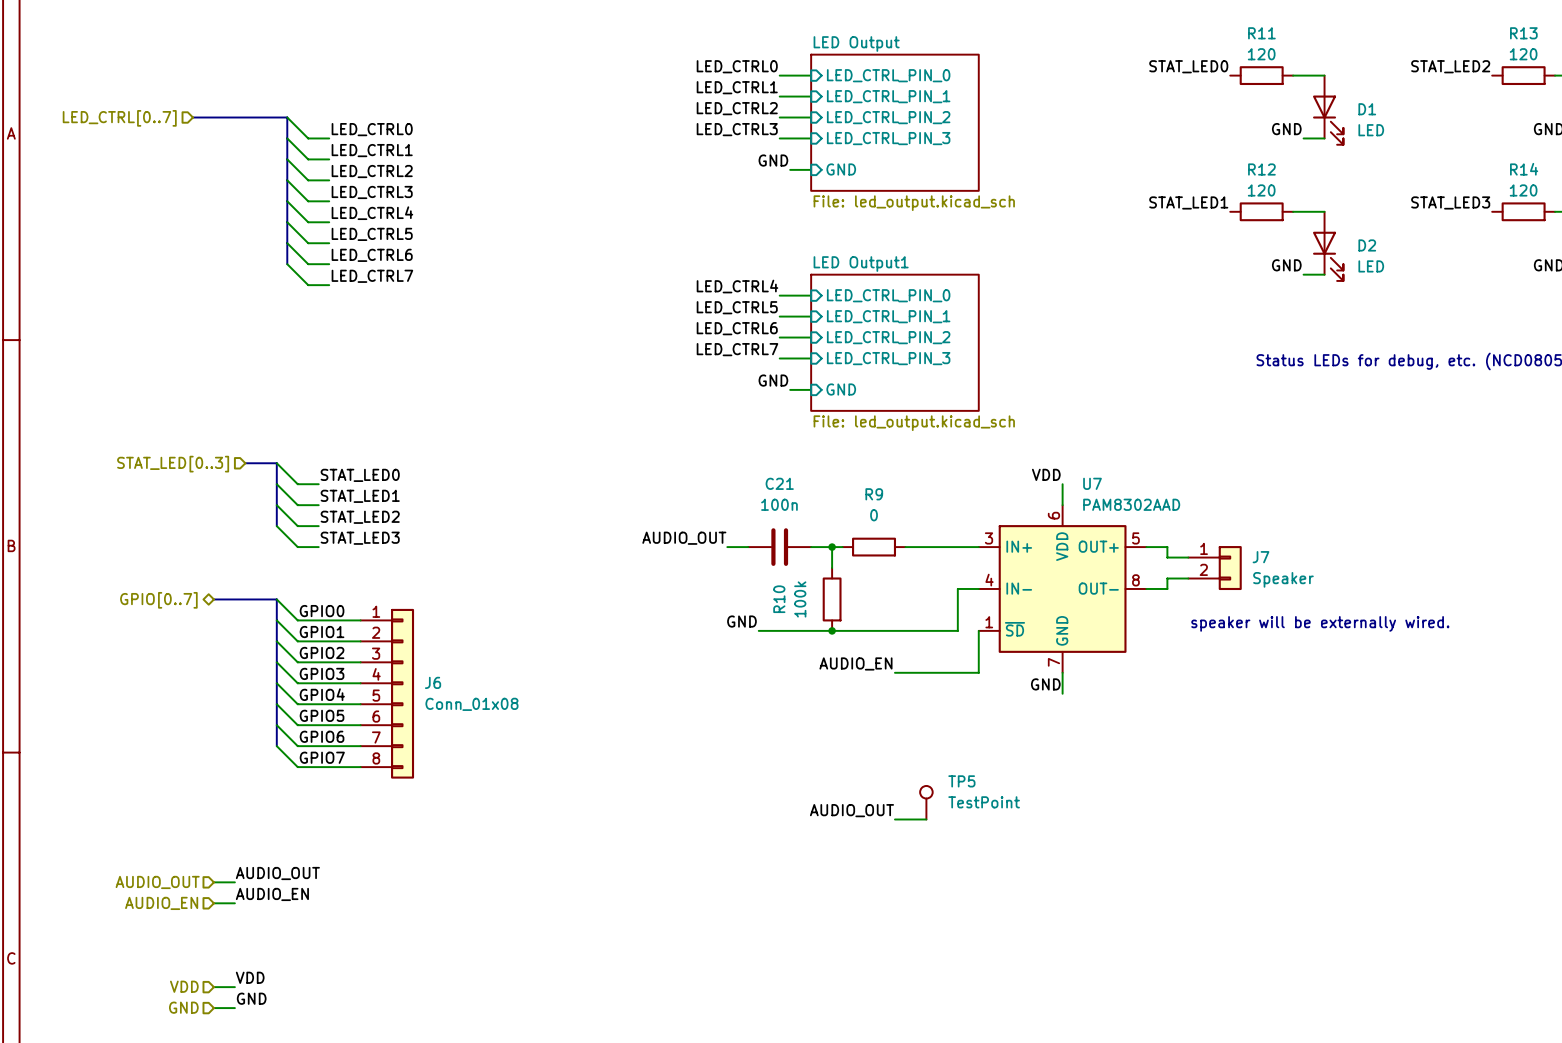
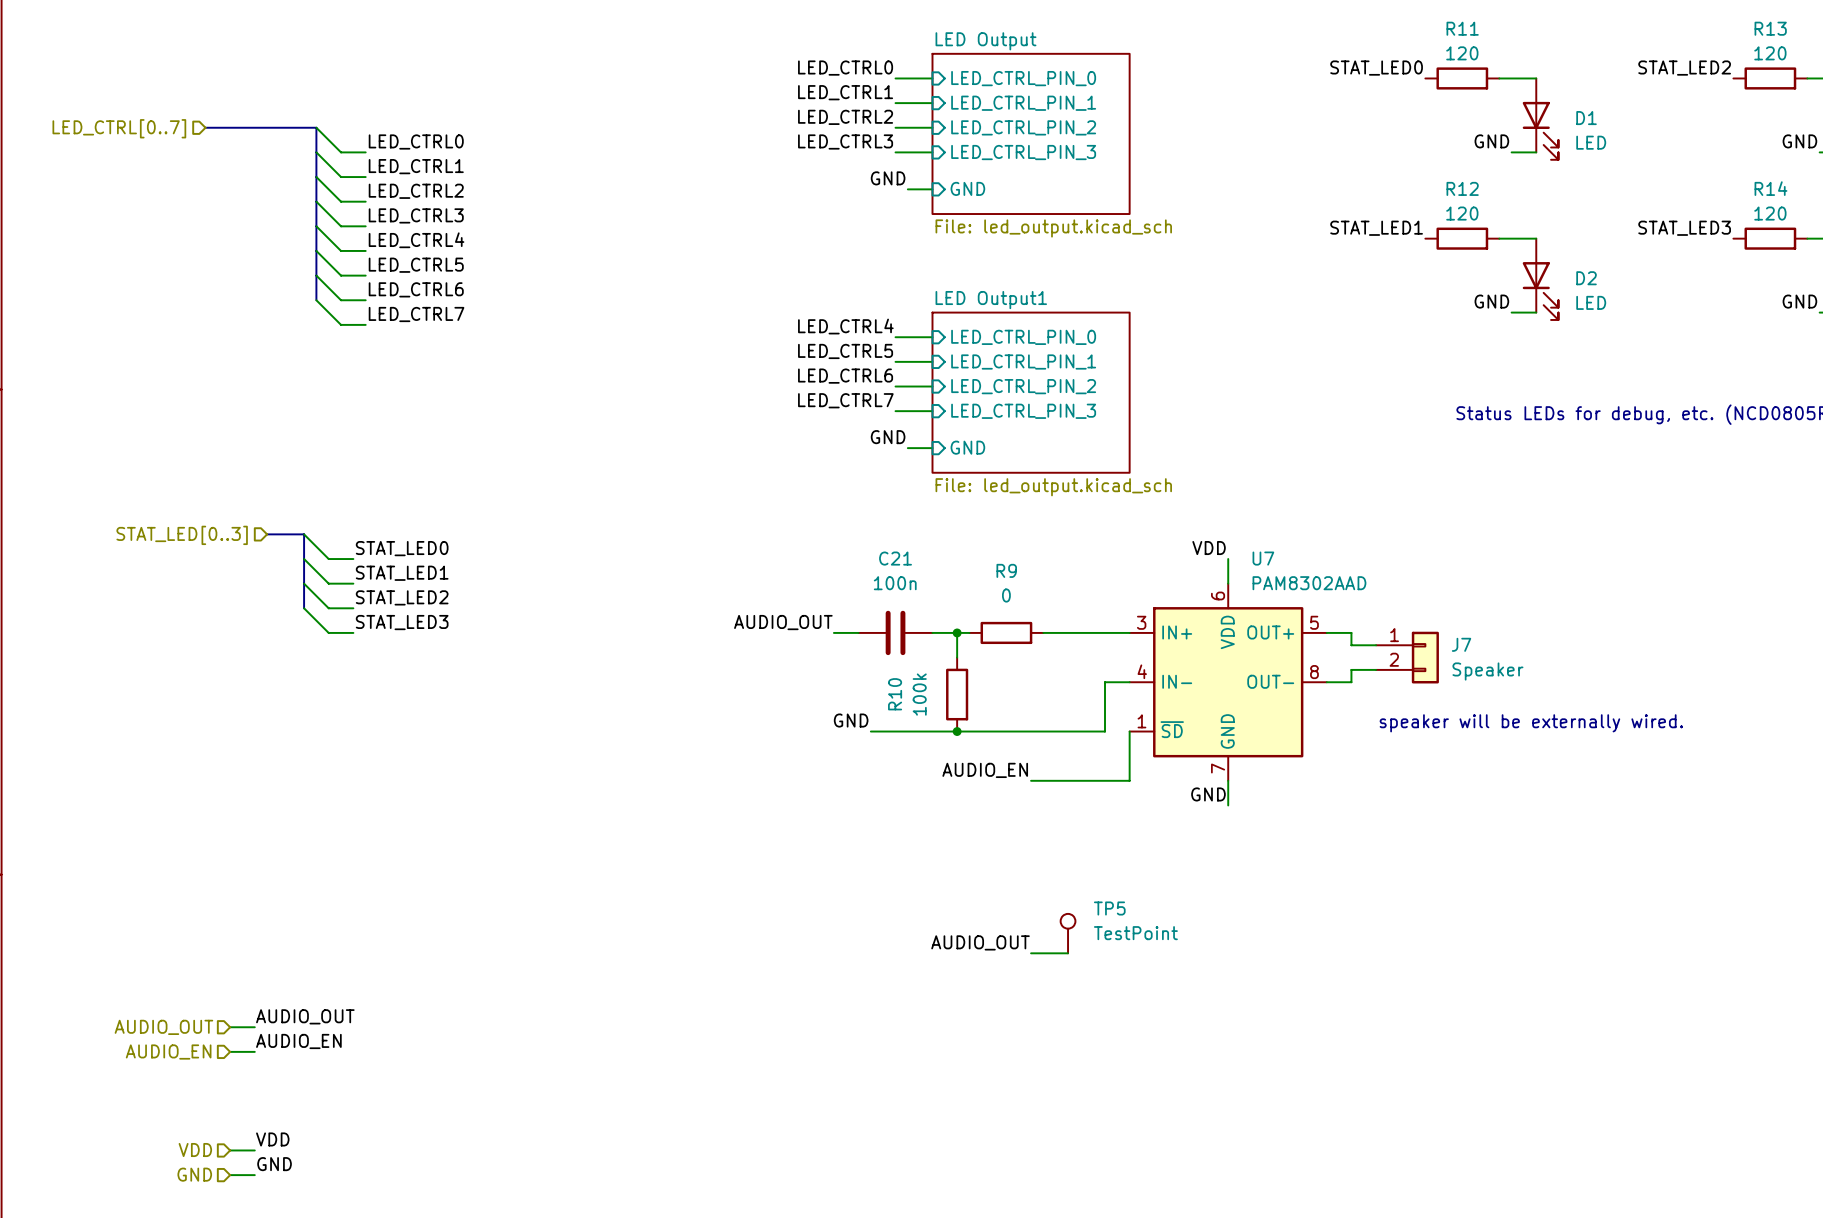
bus: (213, 599) (276, 599) (276, 746) -> none
wire: (276, 599) (297, 620) (360, 620) -> none
hierarchical label: GPIO[0..7] (158, 600) -> none
label: GPIO0 (322, 611) -> none
wire: (276, 620) (297, 641) (360, 641) -> none
label: GPIO1 (322, 632) -> none
wire: (276, 641) (297, 662) (360, 662) -> none
label: GPIO2 (322, 652) -> none
wire: (276, 662) (297, 683) (360, 683) -> none
label: GPIO3 (322, 673) -> none
wire: (276, 683) (297, 704) (360, 704) -> none
J6: Conn_01x08 (387, 693) -> none
label: GPIO4 (322, 694) -> none
wire: (276, 704) (297, 725) (360, 725) -> none
label: GPIO5 (322, 715) -> none
wire: (276, 725) (297, 746) (360, 746) -> none
label: GPIO6 (322, 736) -> none
wire: (276, 746) (297, 767) (360, 767) -> none
label: GPIO7 (322, 757) -> none

